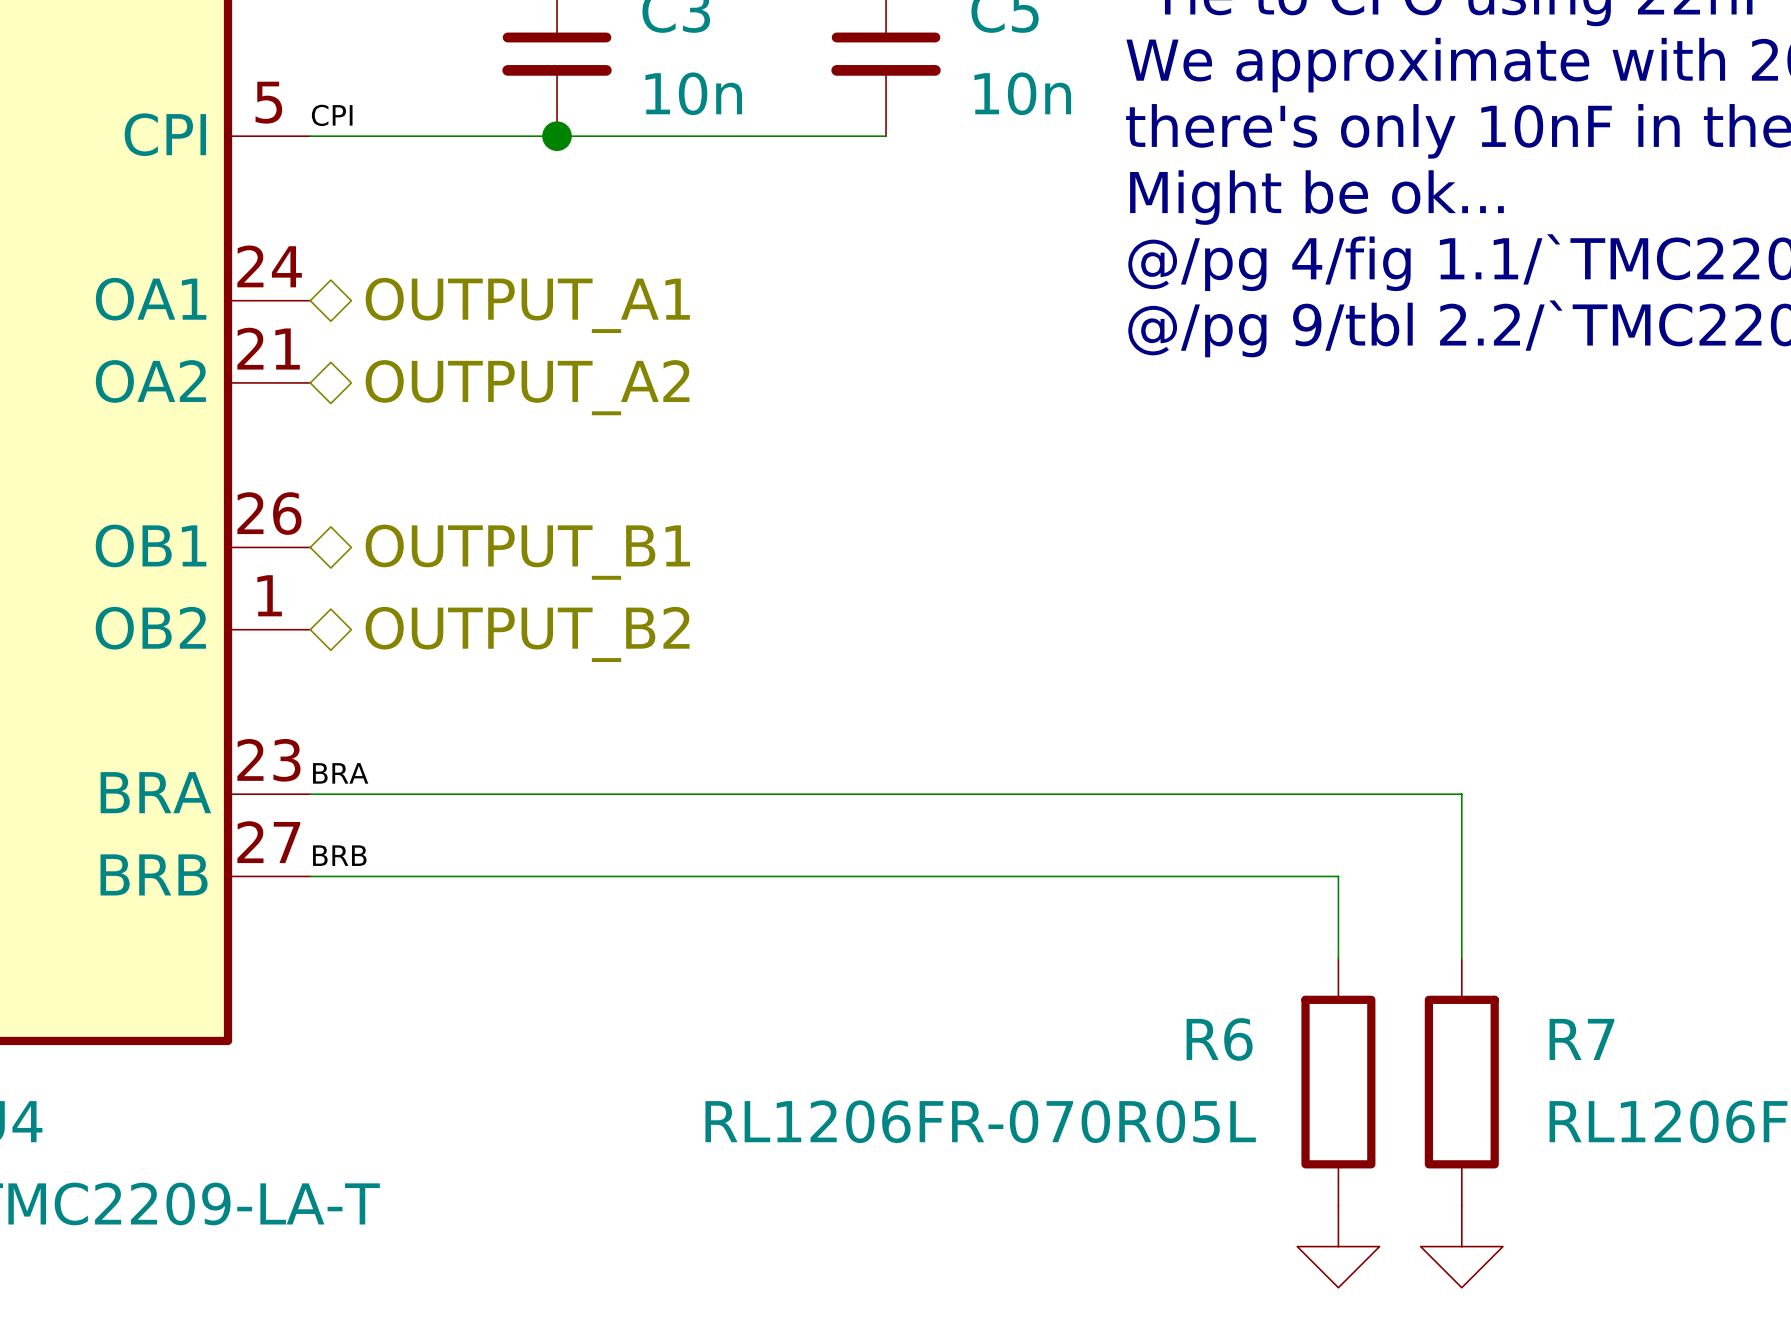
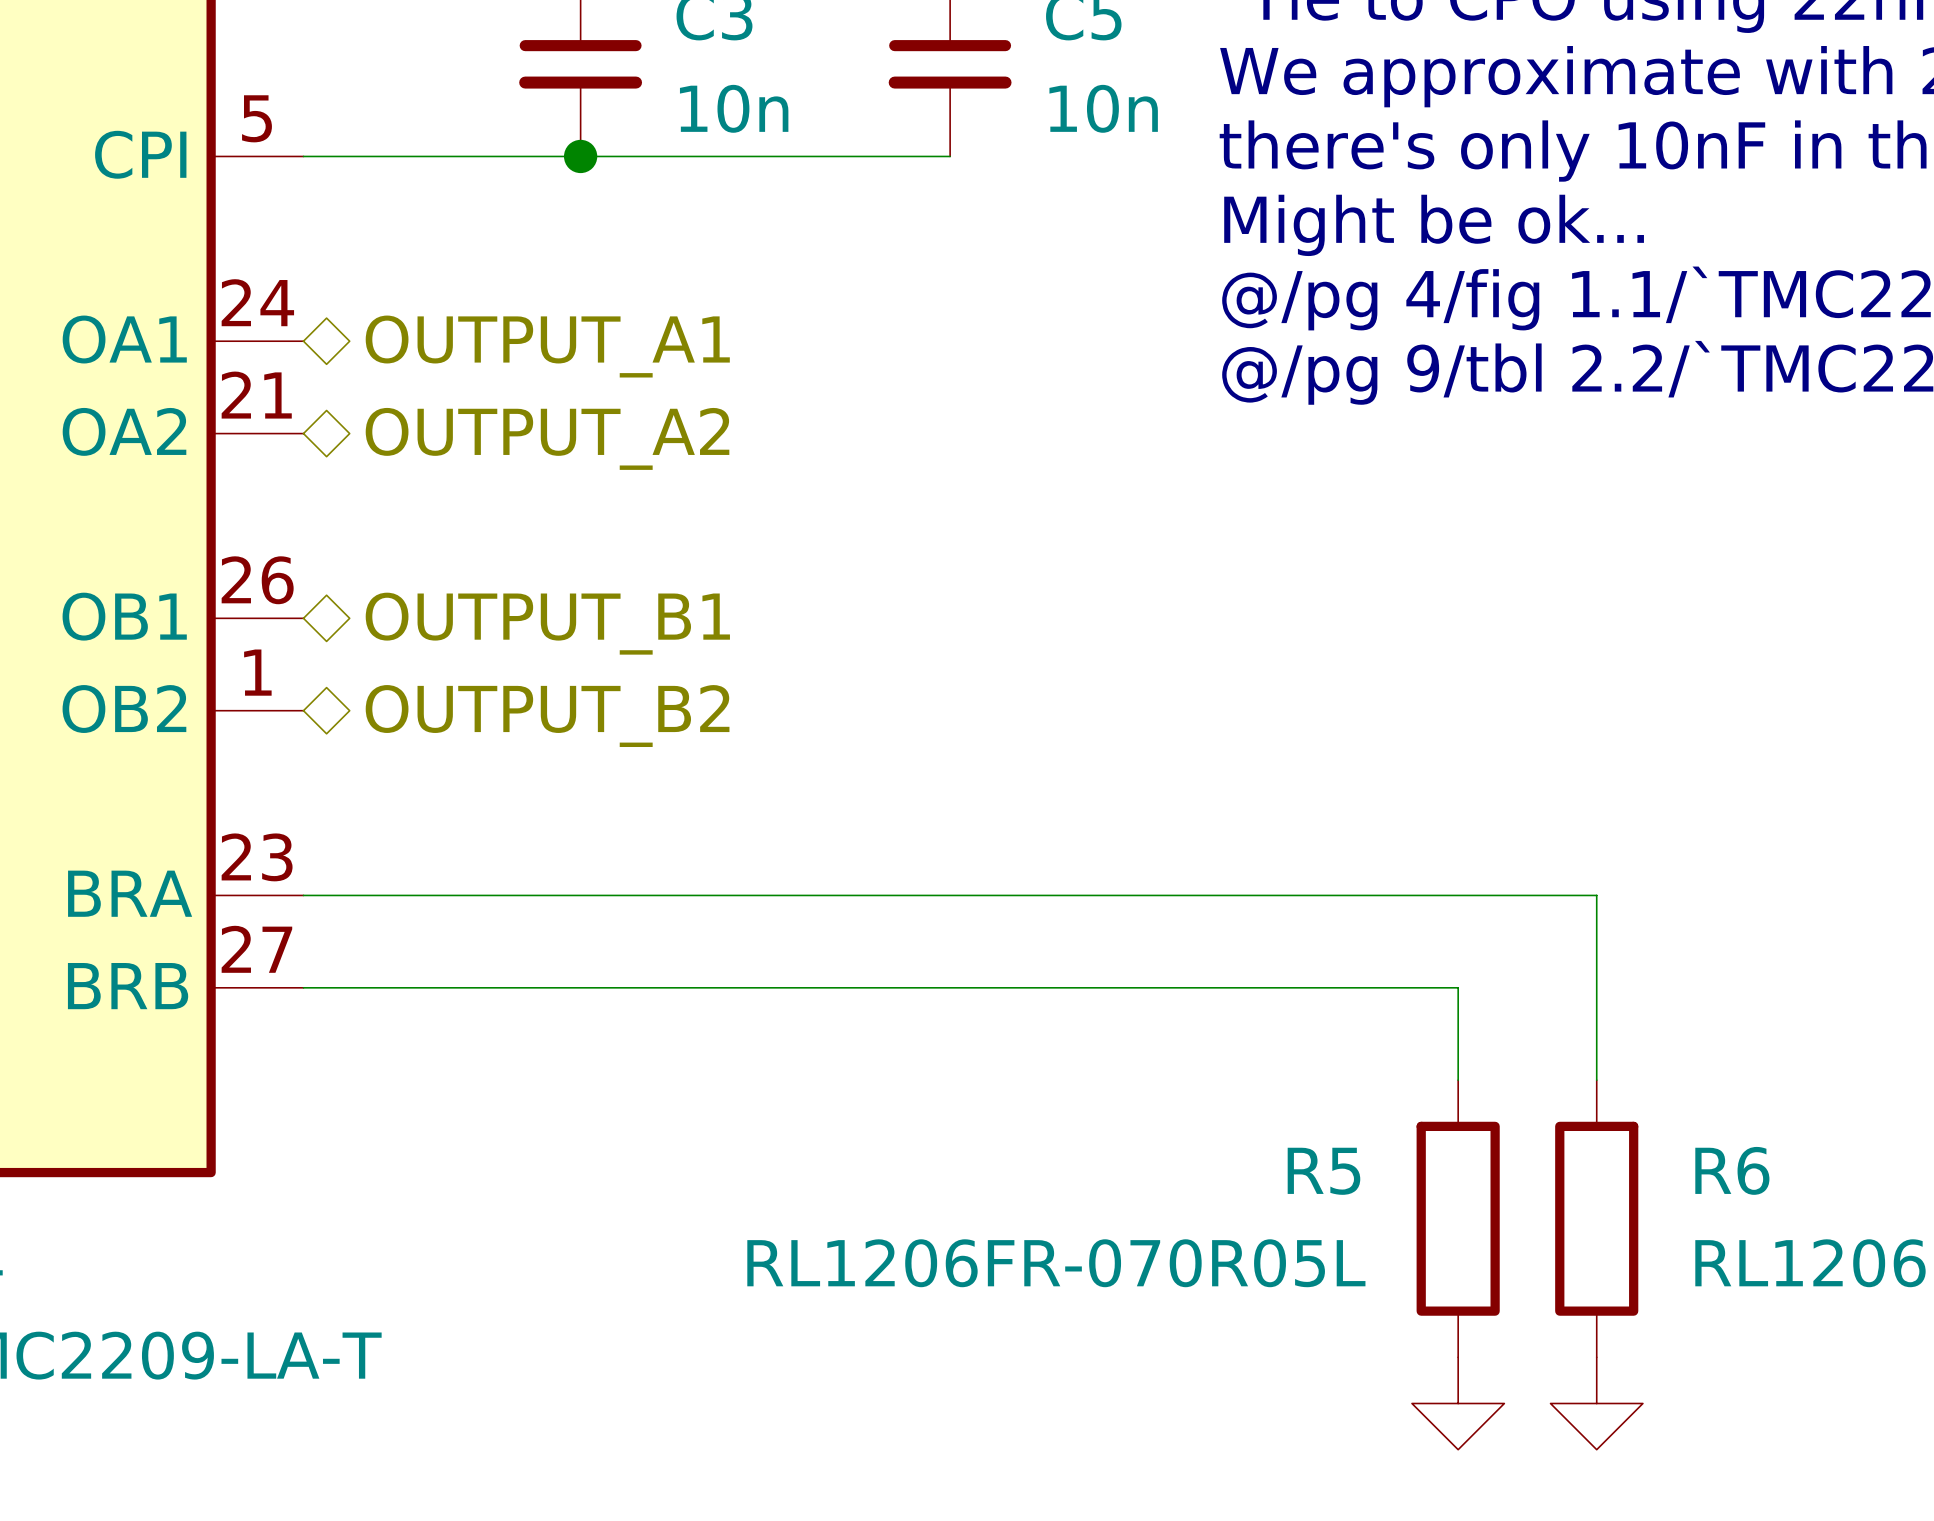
label: CPI (332, 115) -> none
label: BRA (340, 773) -> none
label: BRB (339, 855) -> none
R6 name: R6 (1219, 1039) -> R5 (1323, 1171)
R7 name: R7 (1581, 1039) -> R6 (1732, 1170)

